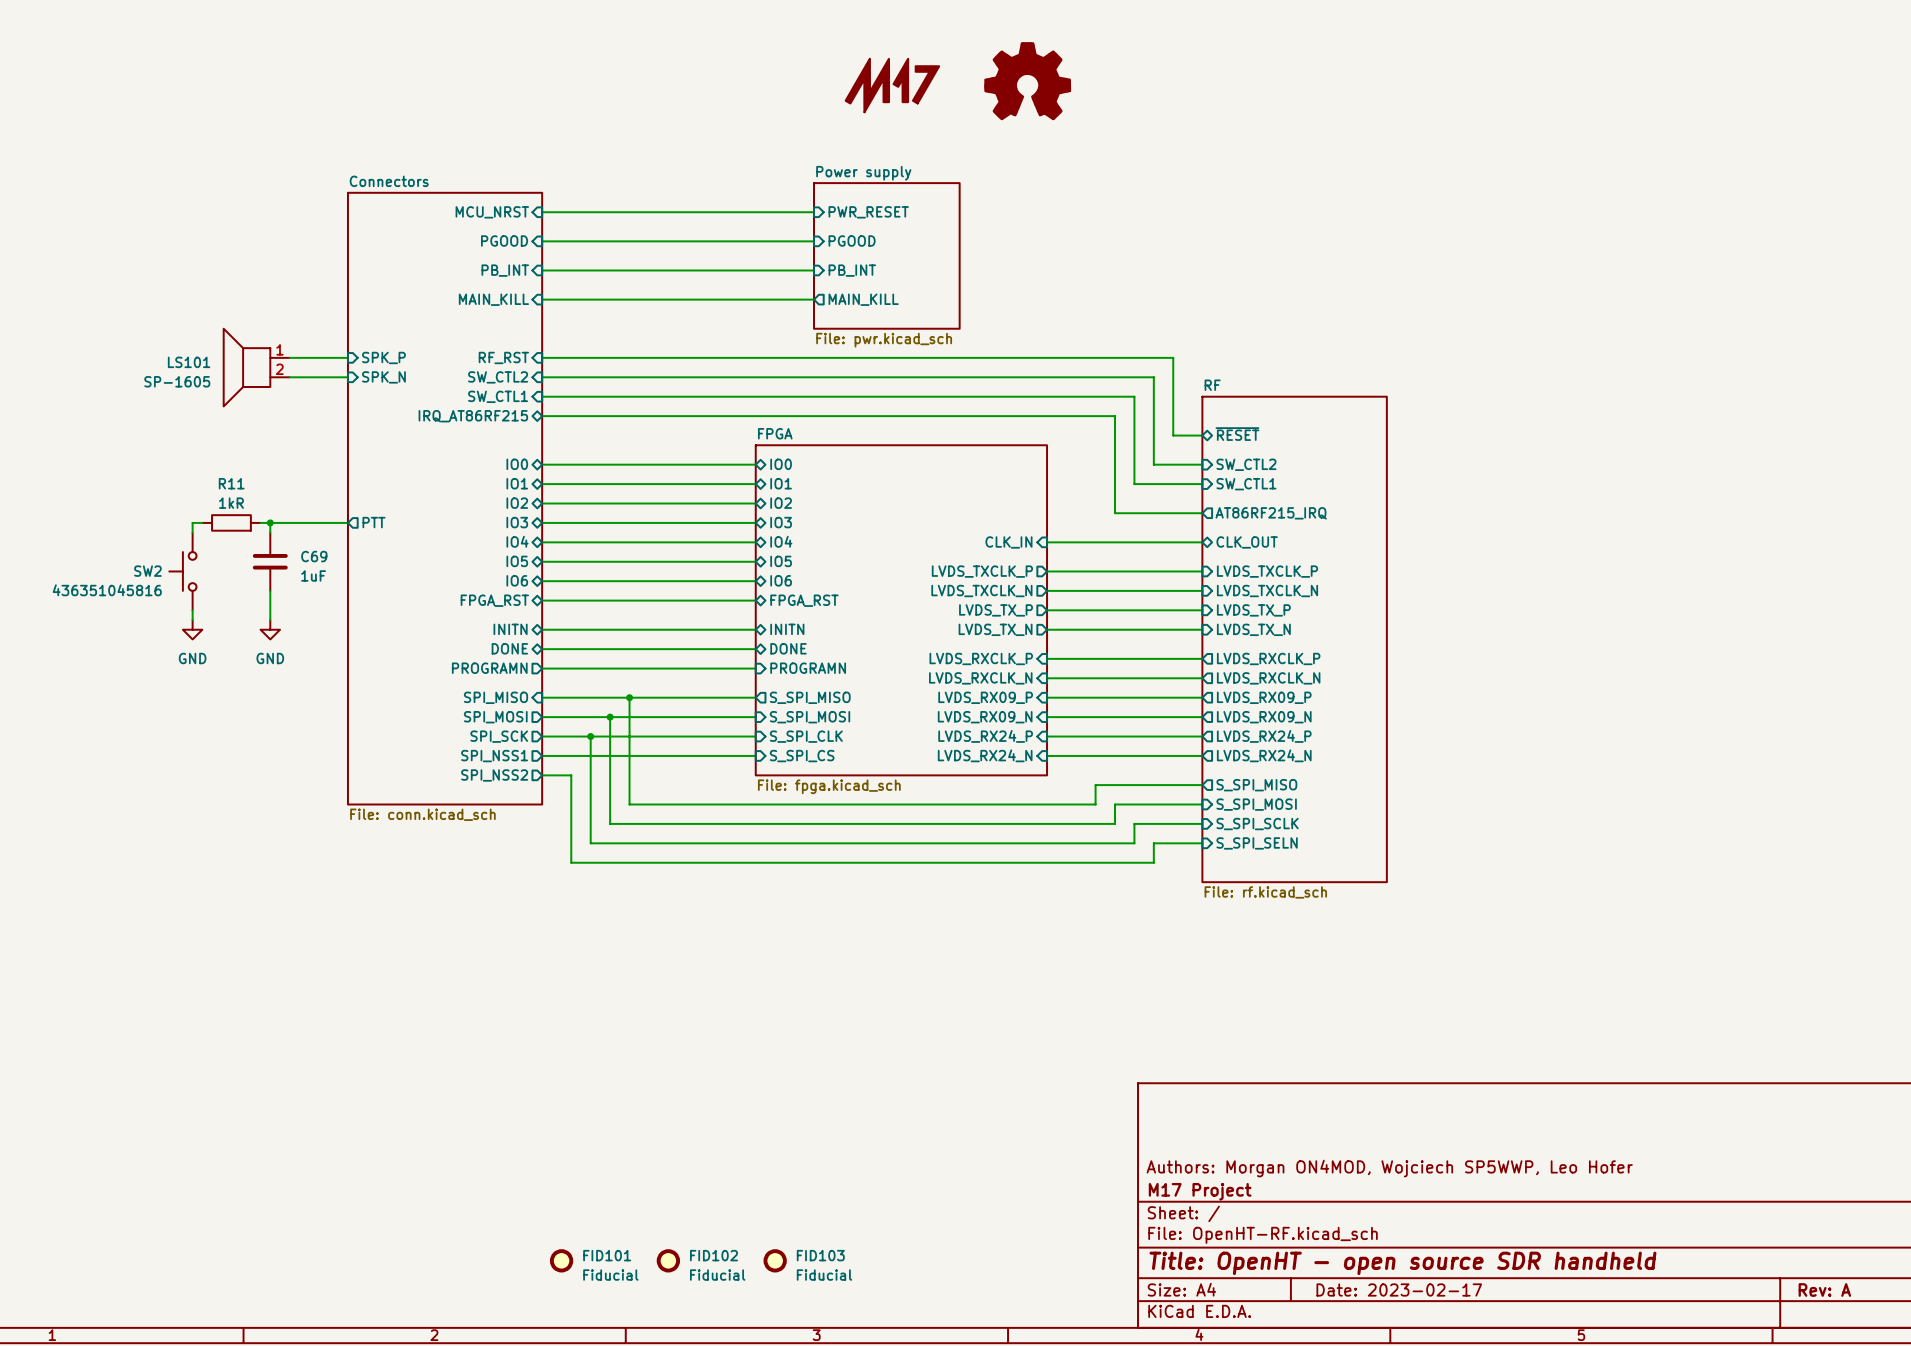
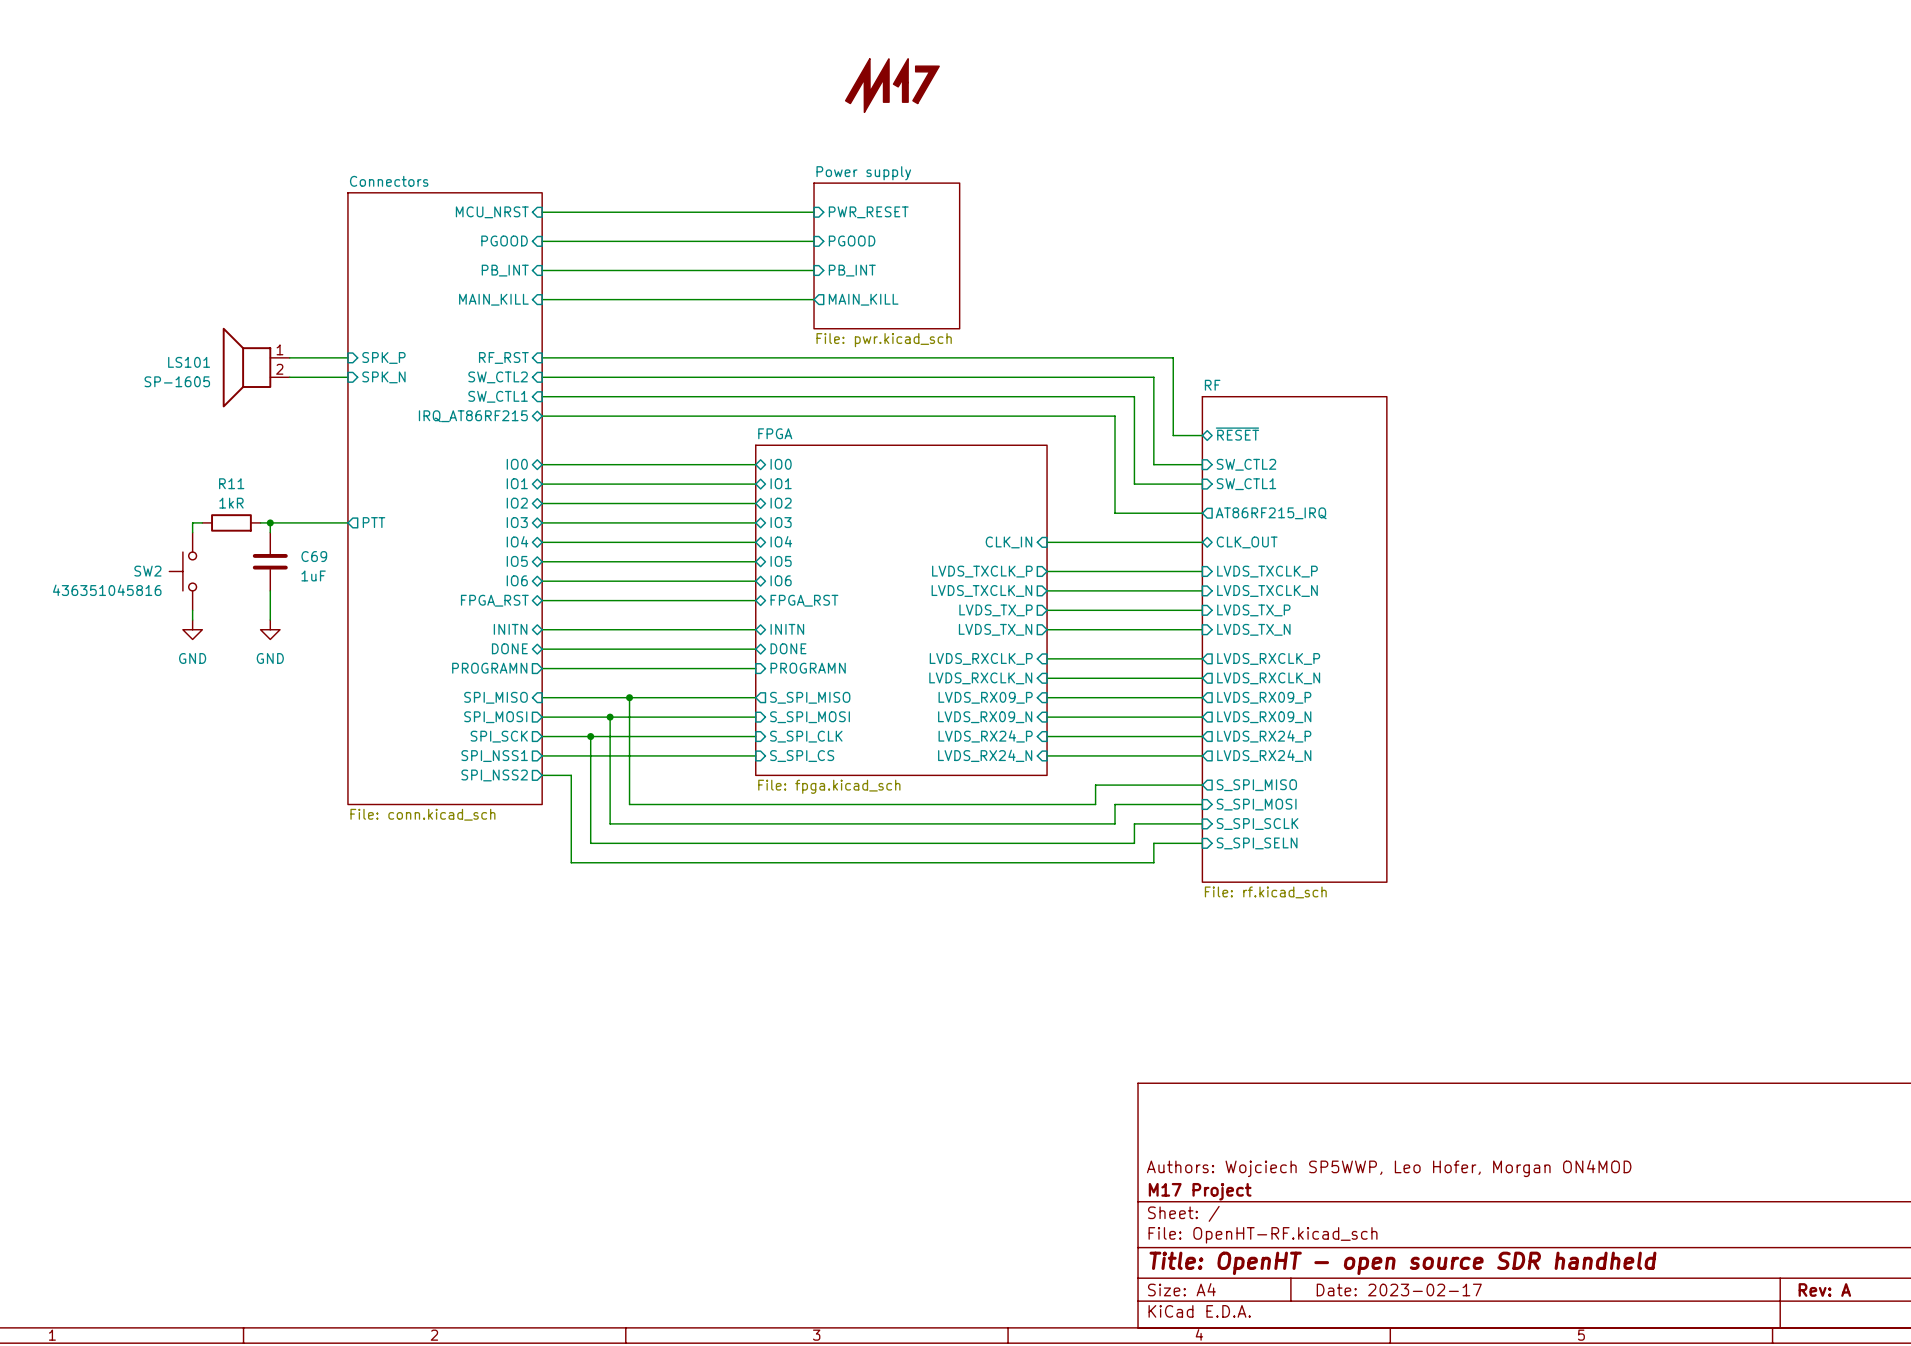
part: (1027, 81) -> none
title block: Authors: Morgan ON4MOD, Wojciech SP5WWP, Leo Hofer (1389, 1168) -> Authors: Wojciech SP5WWP, Leo Hofer, Morgan ON4MOD (1389, 1168)
FID101: Fiducial (561, 1260) -> none
FID102: Fiducial (668, 1260) -> none
FID103: Fiducial (775, 1260) -> none

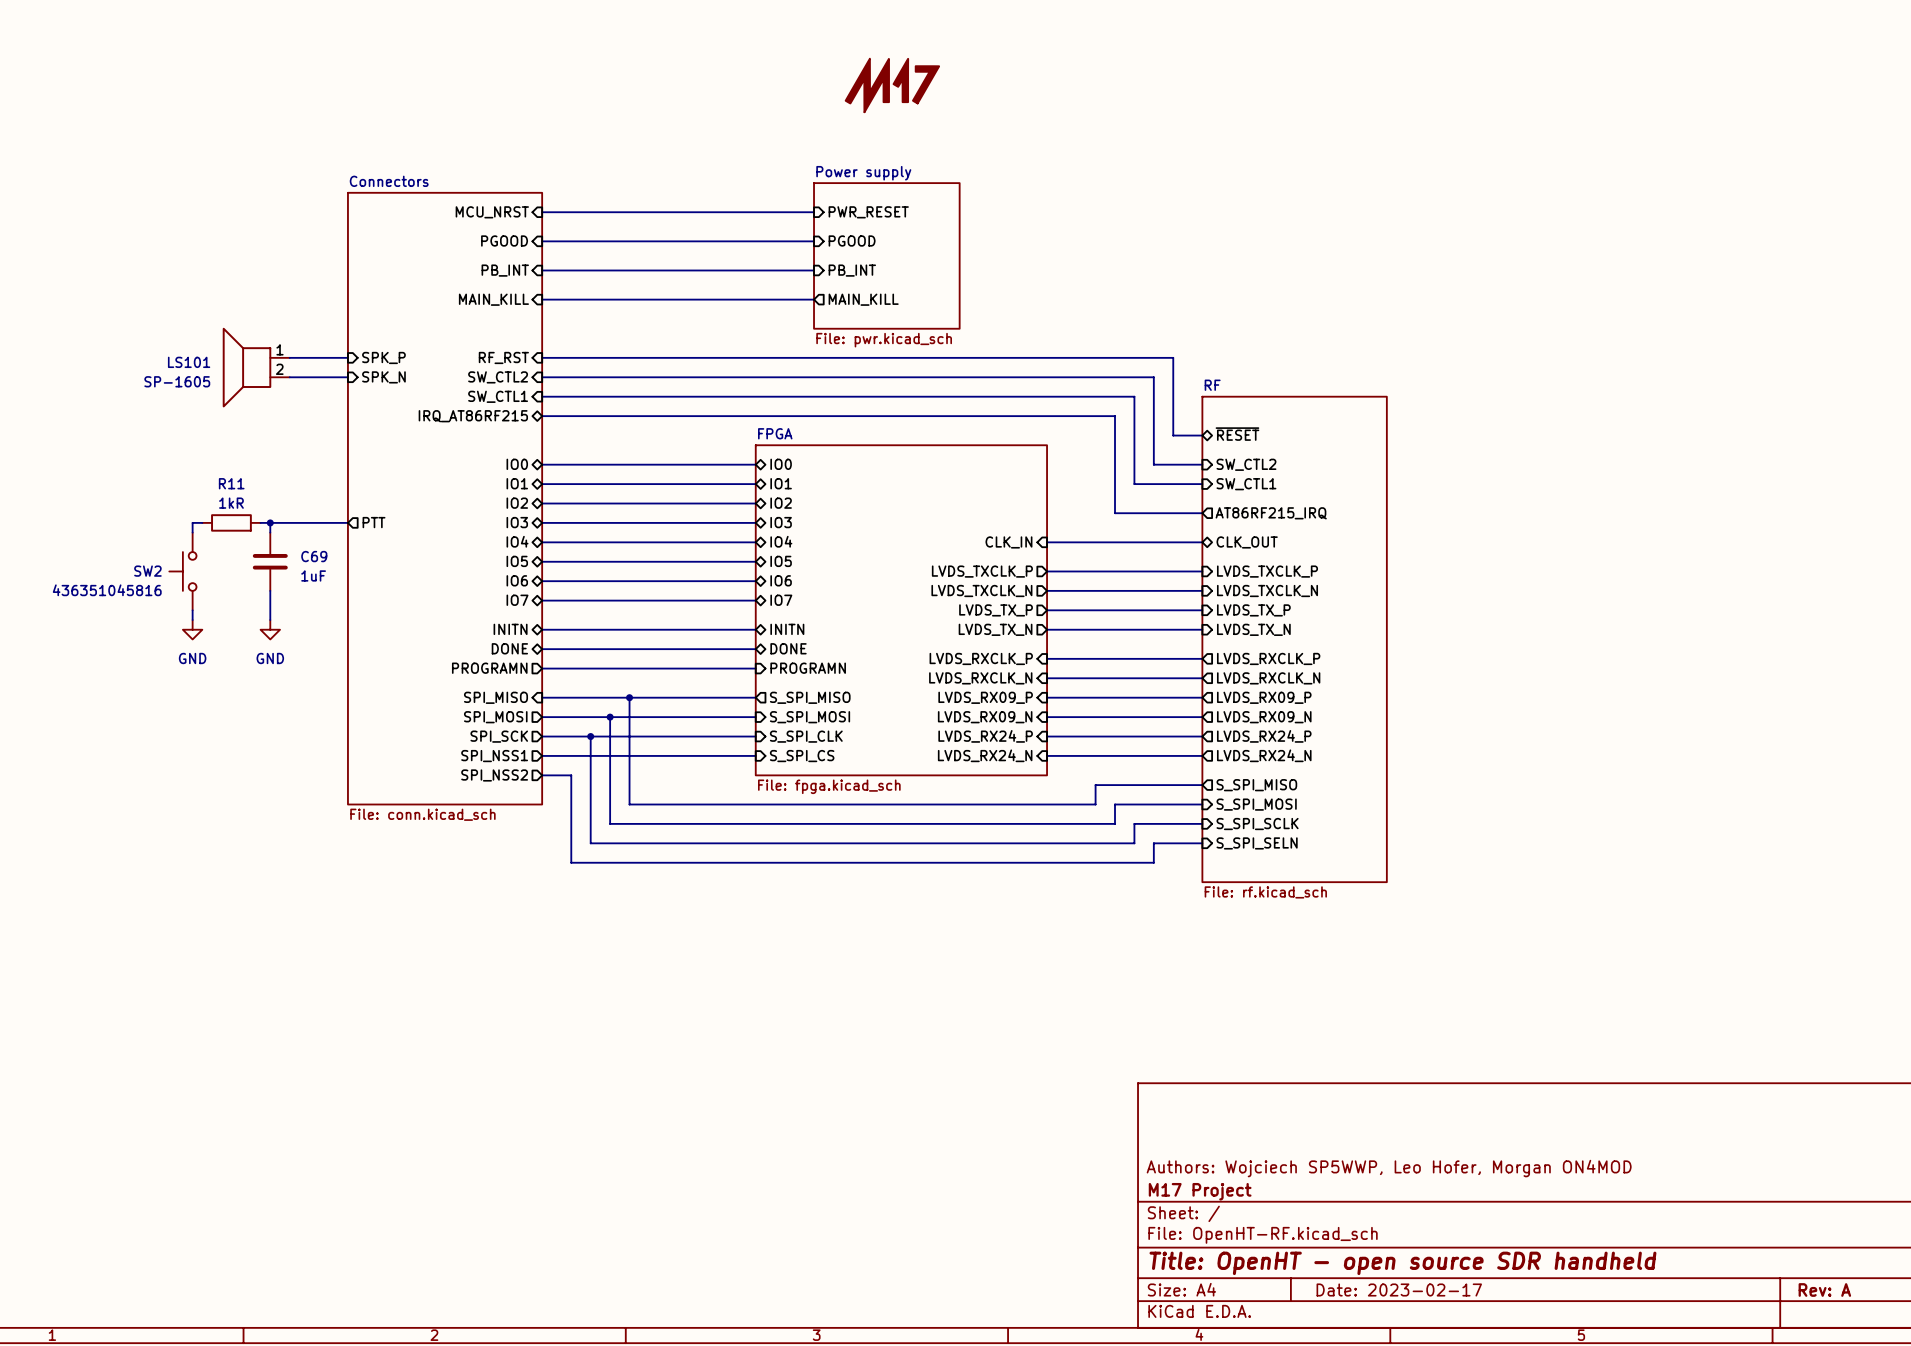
sheet pin: FPGA_RST (494, 600) -> IO7 (517, 600)
sheet pin: FPGA_RST (804, 600) -> IO7 (781, 600)

